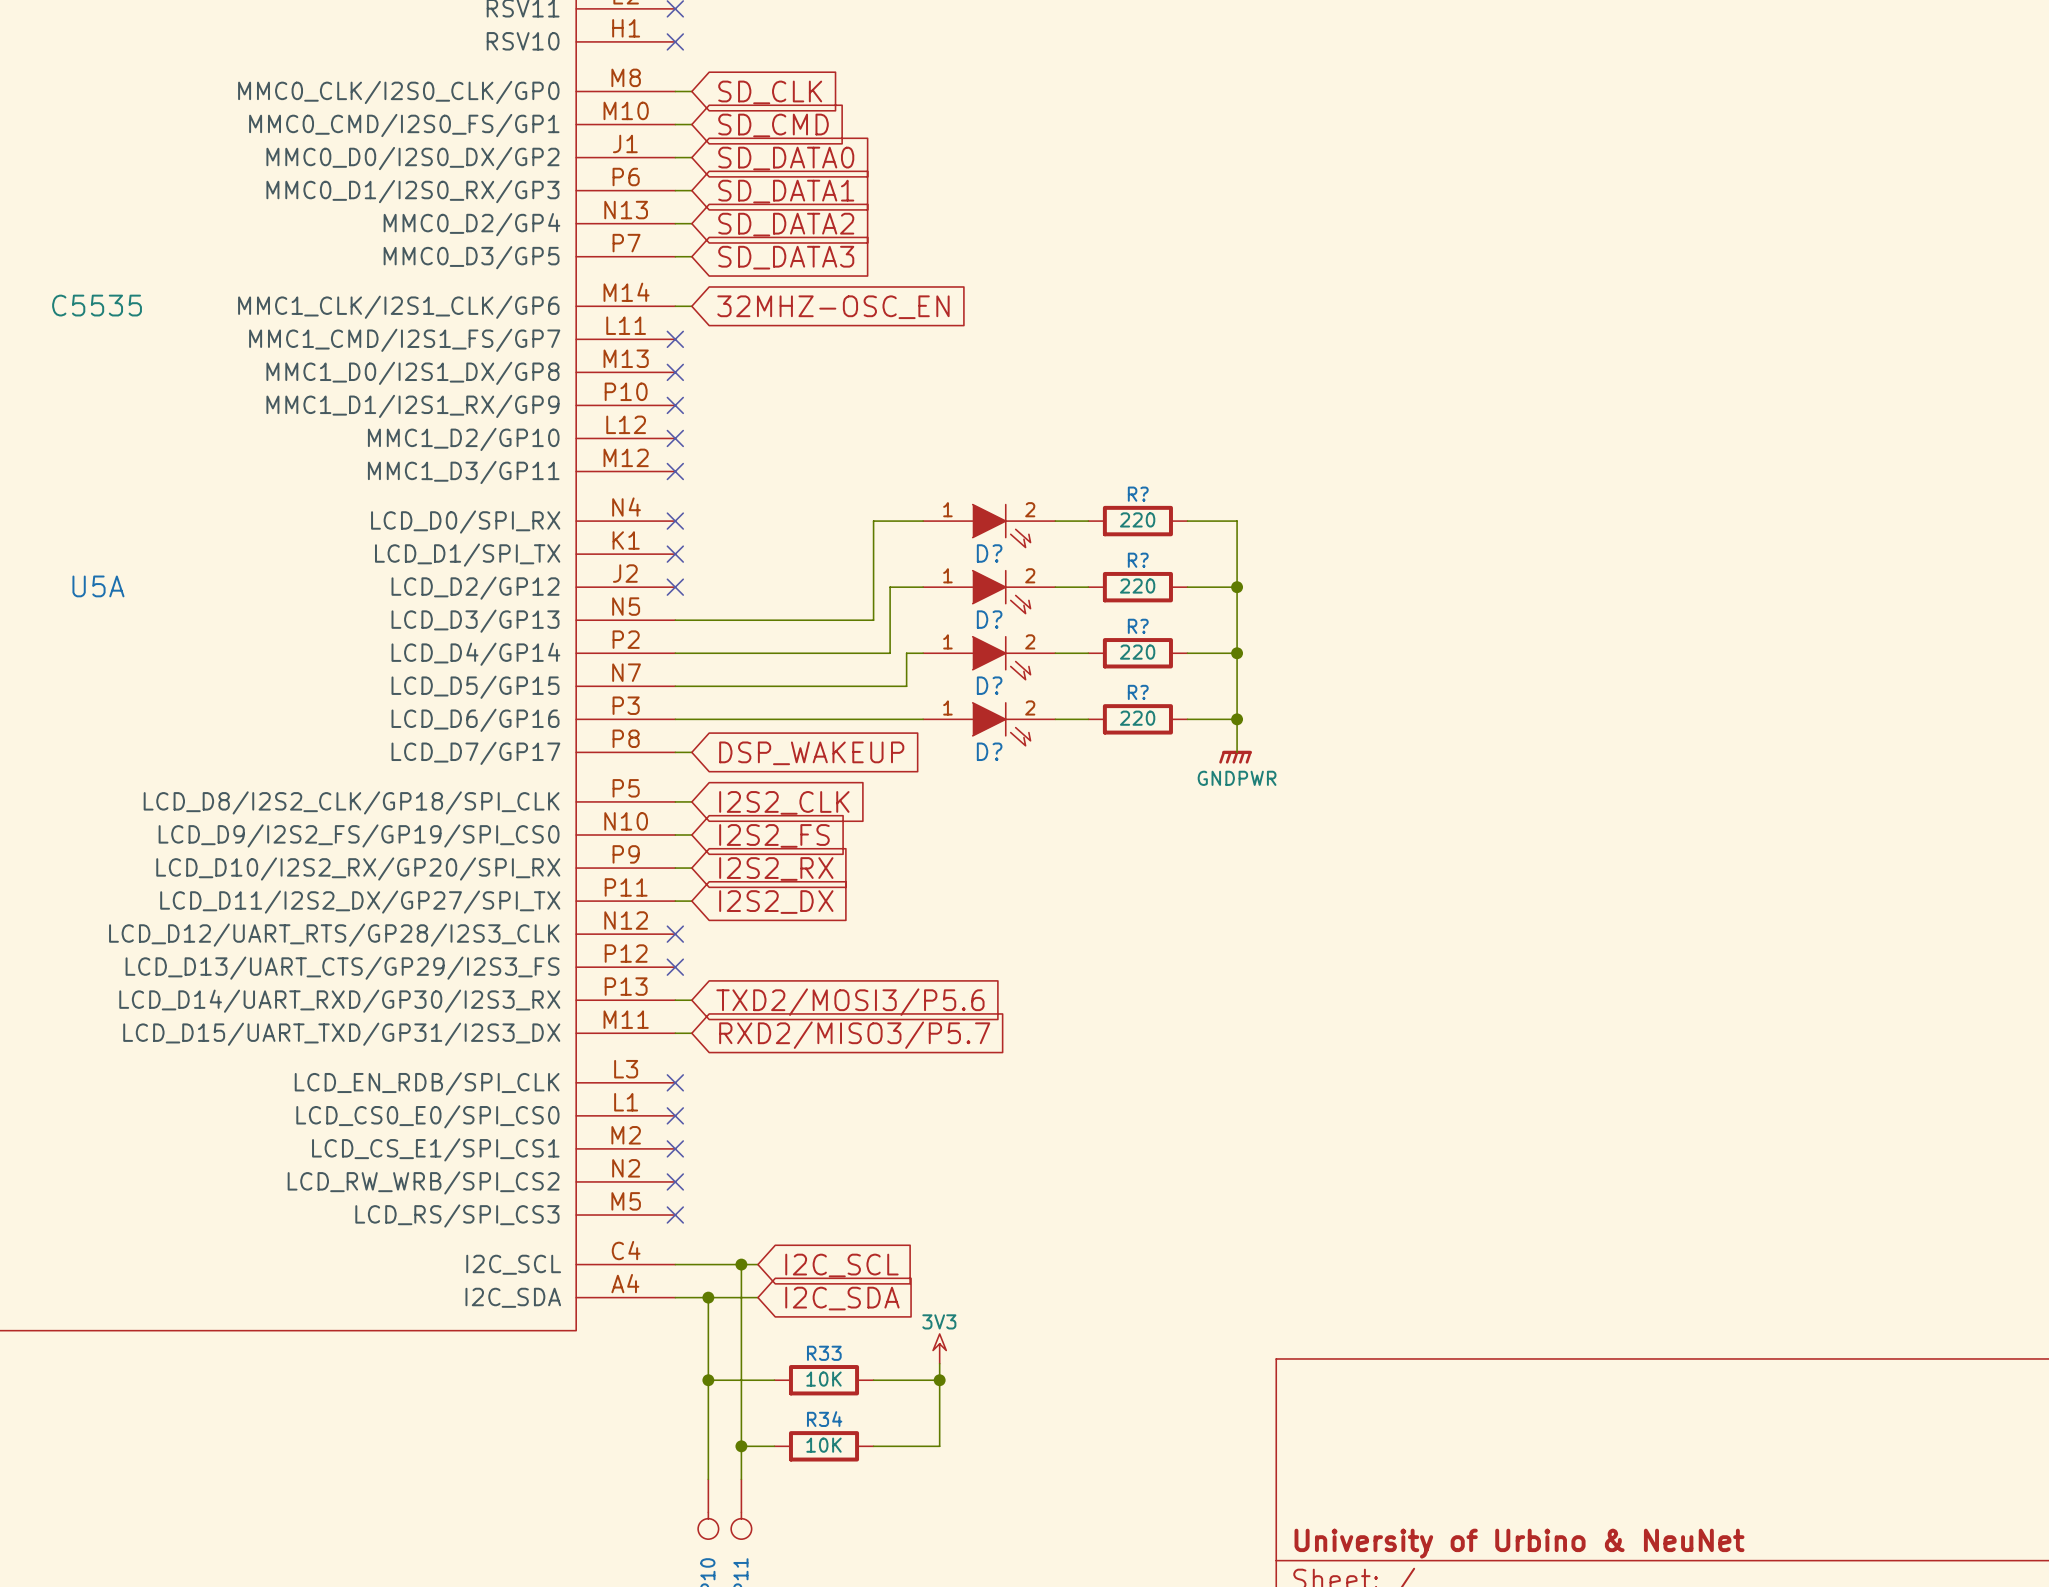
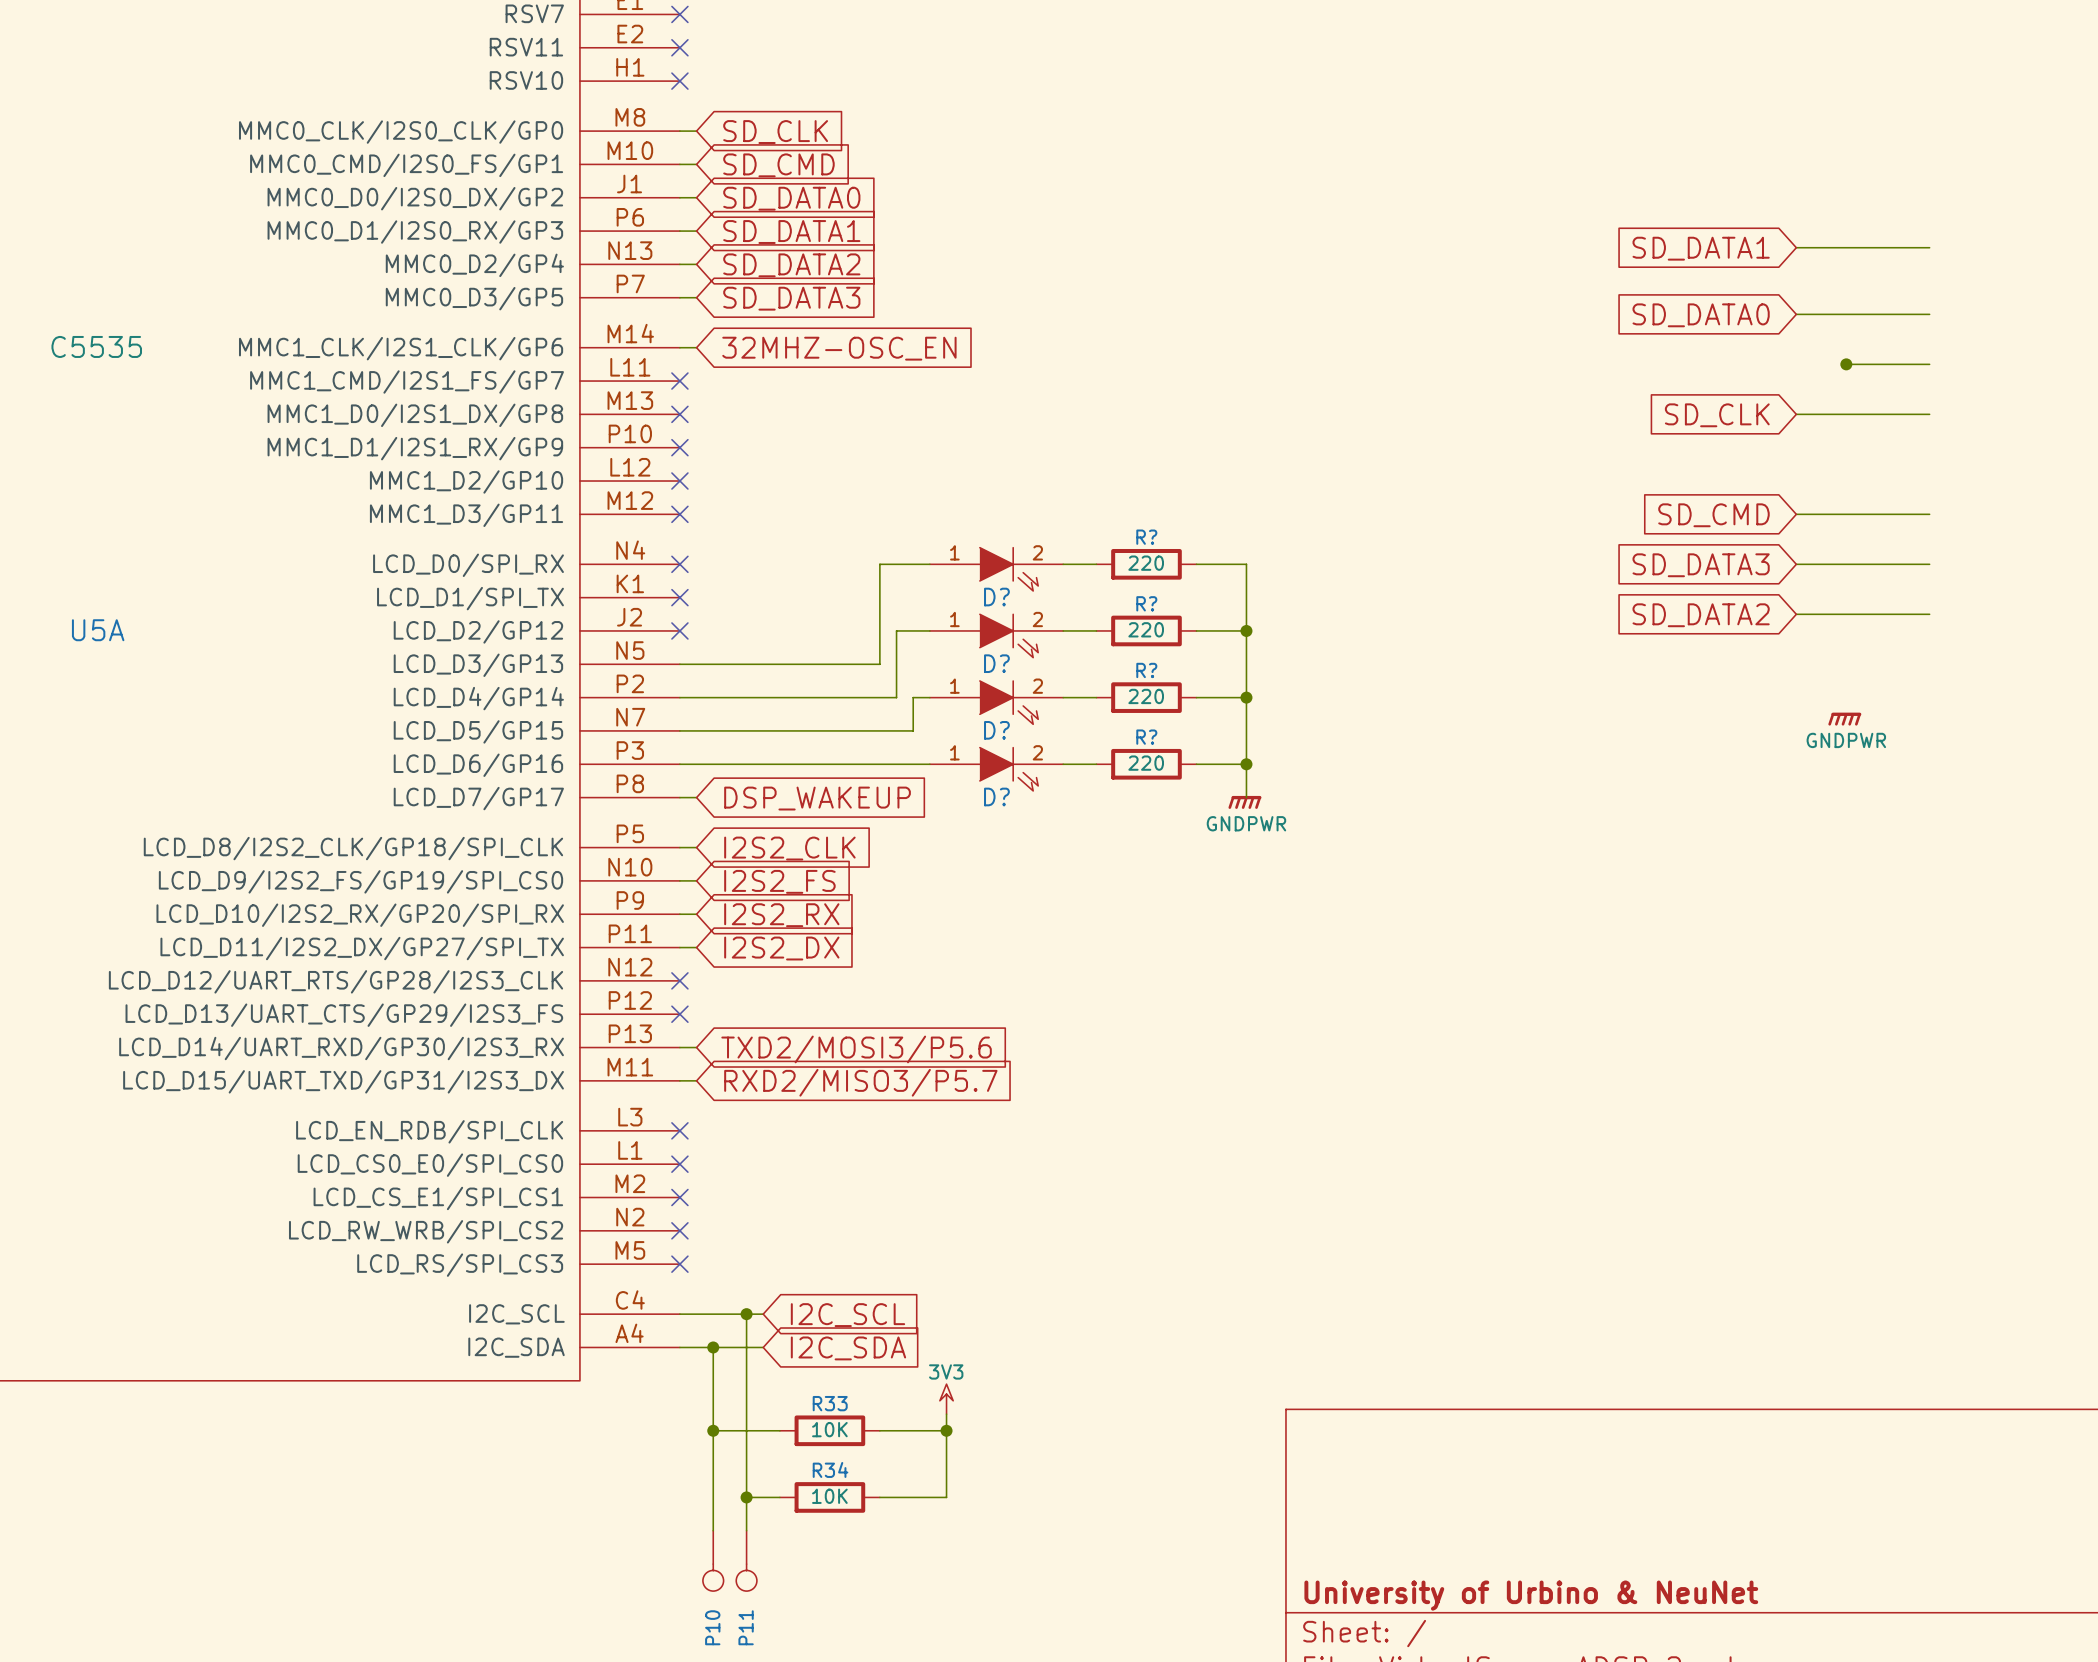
wire: none -> (1796, 247) (1929, 247)
global label: none -> SD_DATA1 (1701, 248)
wire: none -> (1796, 314) (1929, 314)
global label: none -> SD_DATA0 (1701, 315)
wire: none -> (1846, 364) (1929, 364)
junction: none -> (1846, 364)
wire: none -> (1796, 414) (1929, 414)
global label: none -> SD_CLK (1717, 415)
wire: none -> (1796, 514) (1929, 514)
global label: none -> SD_CMD (1713, 515)
wire: none -> (1796, 564) (1929, 564)
global label: none -> SD_DATA3 (1701, 565)
wire: none -> (1796, 614) (1929, 614)
global label: none -> SD_DATA2 (1701, 615)
power symbol: none -> GNDPWR (1844, 719)

